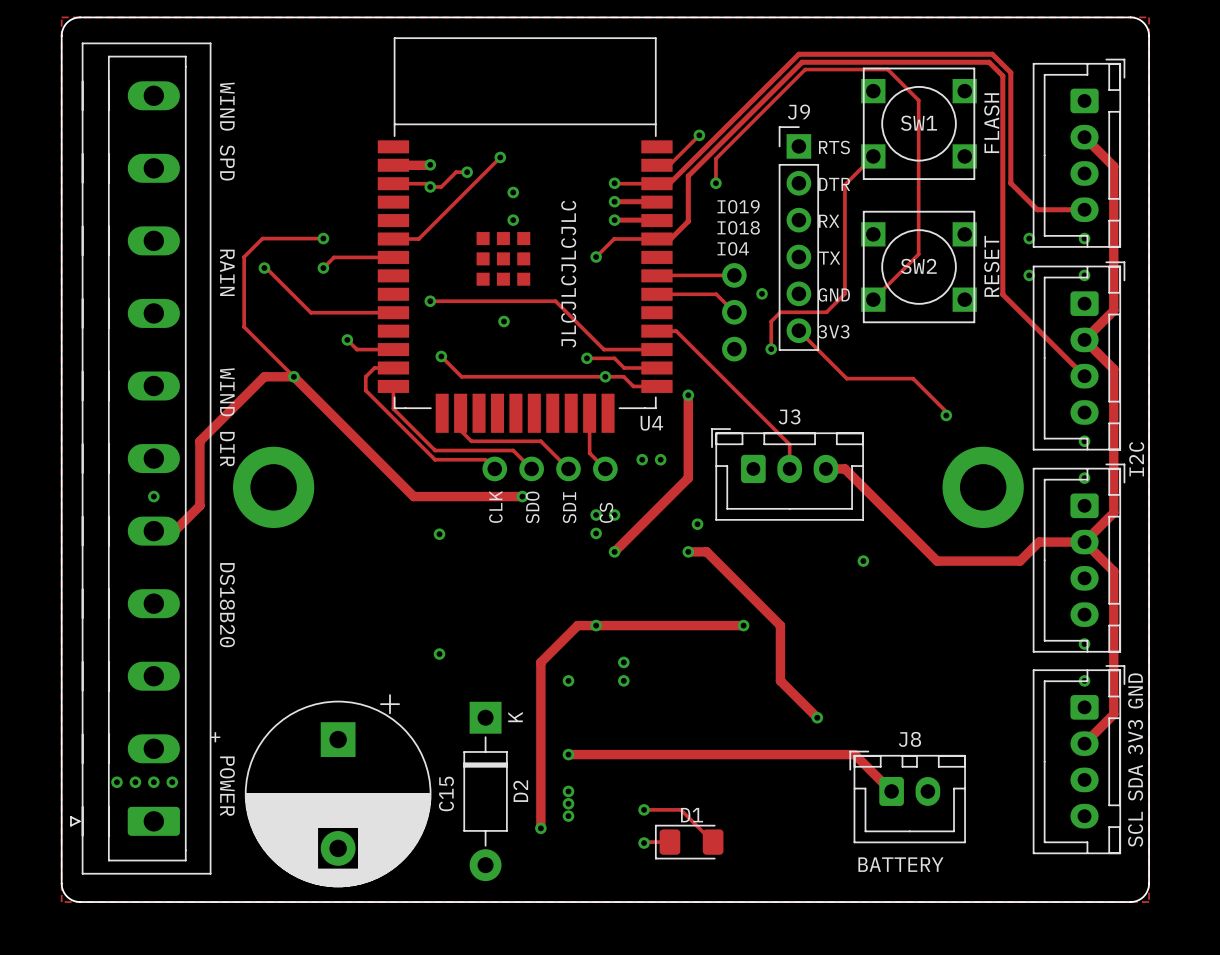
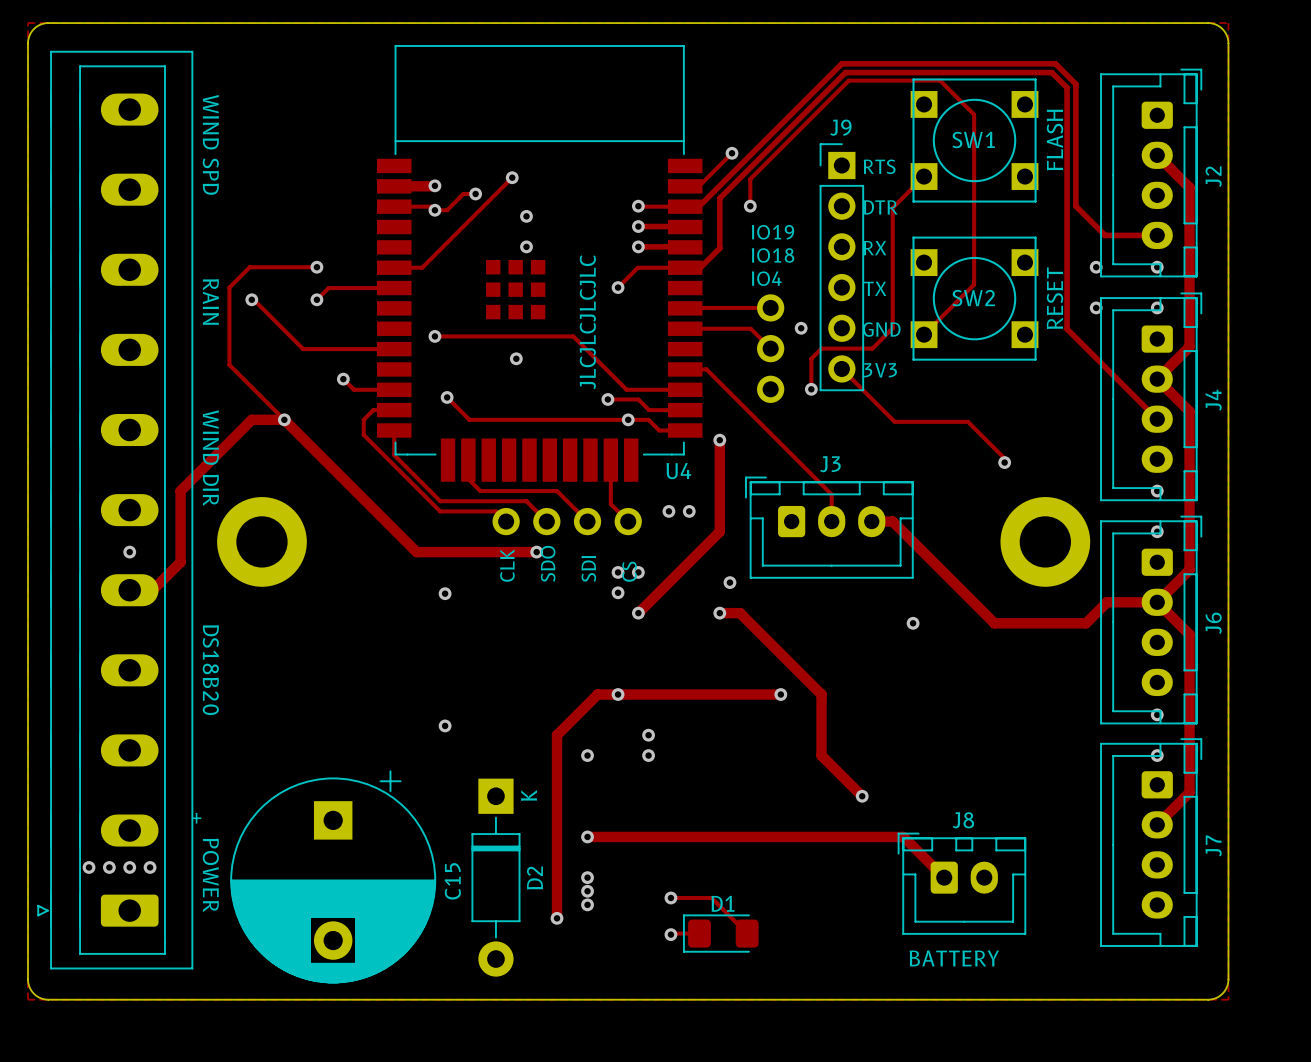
J2 name: none -> J2 (1213, 176)
J4 name: none -> J4 (1213, 400)
text: I2C (1136, 459) -> none
J6 name: none -> J6 (1213, 623)
text: GND (1135, 690) -> none
text: 3V3 (1135, 737) -> none
J7 name: none -> J7 (1213, 845)
text: SDA (1135, 782) -> none
text: SCL (1135, 829) -> none

